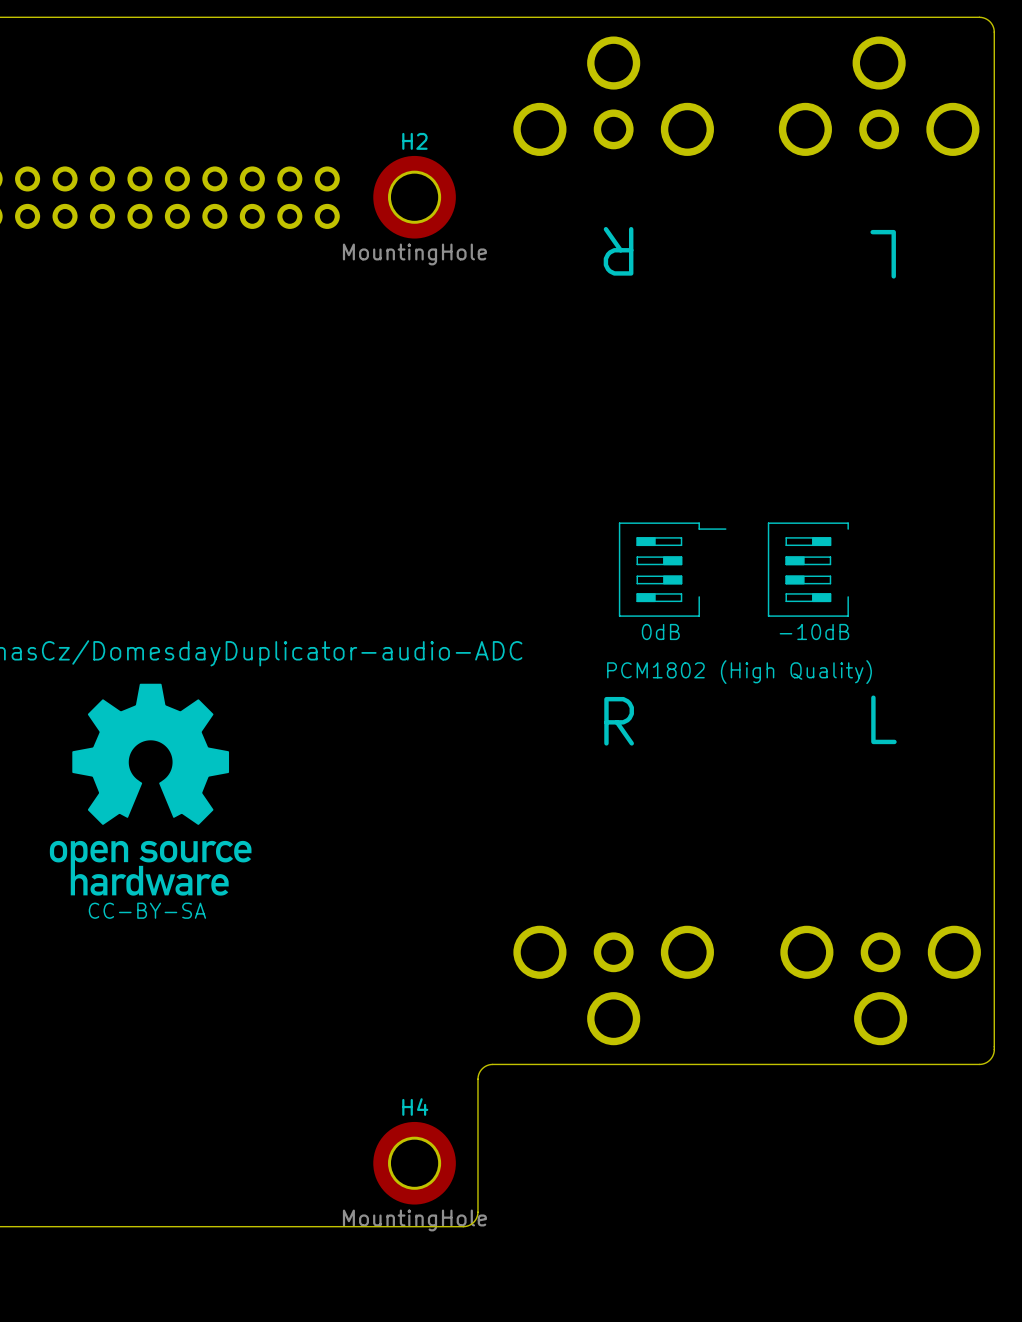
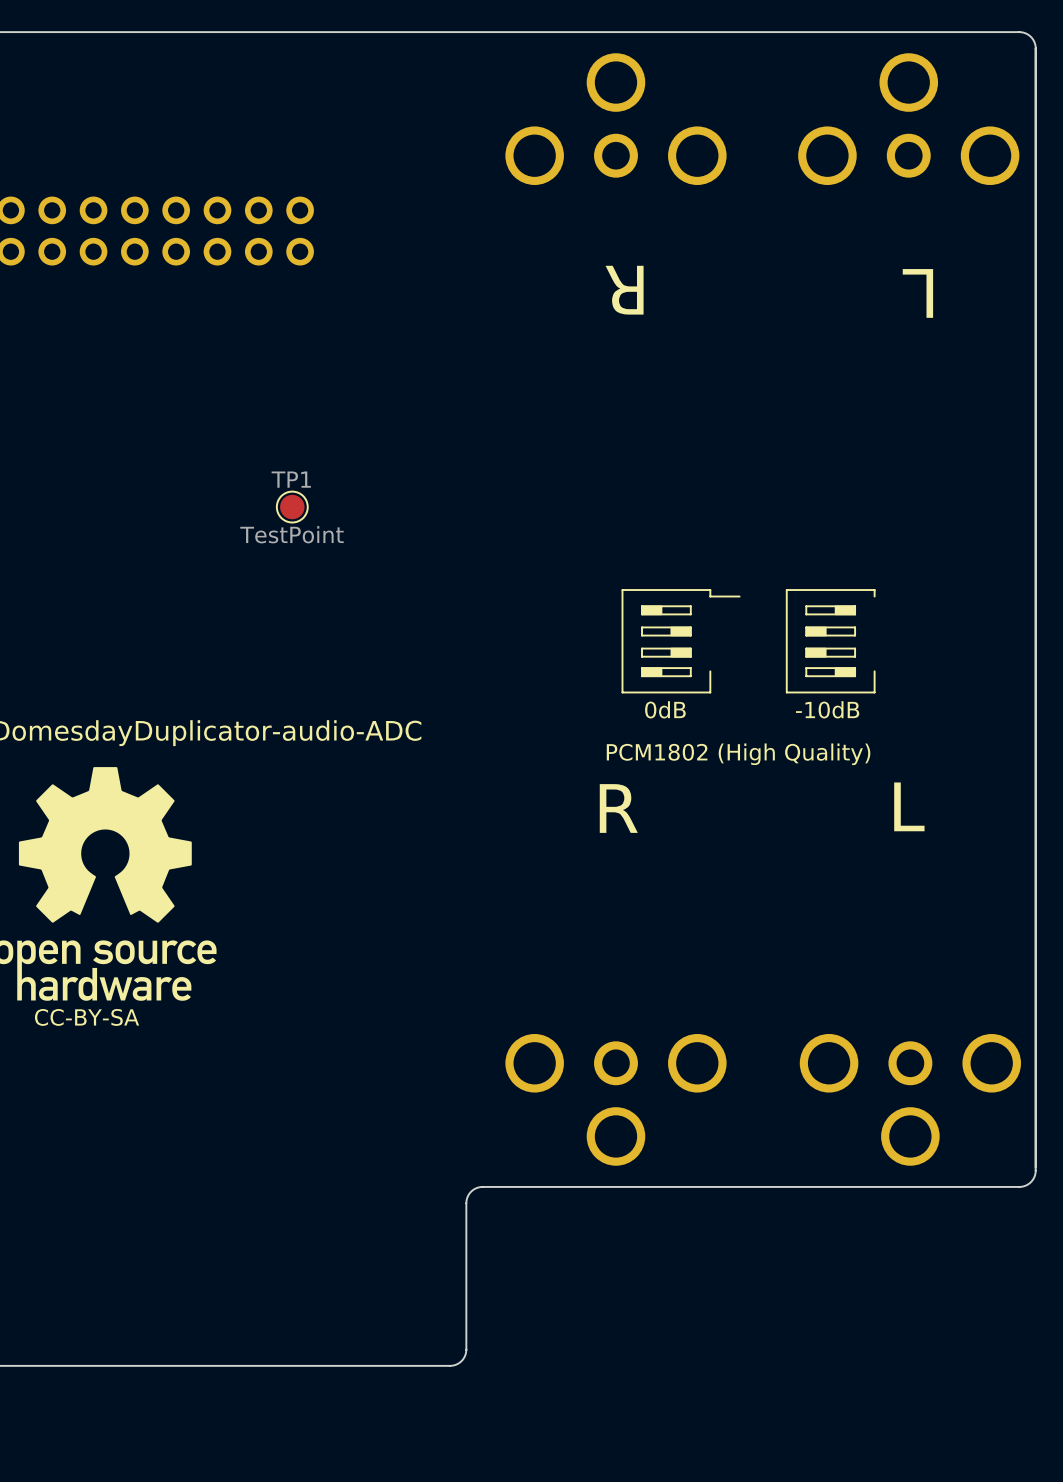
H2: MountingHole (414, 197) -> none
TP1: none -> TestPoint (292, 507)
H4: MountingHole (414, 1163) -> none

